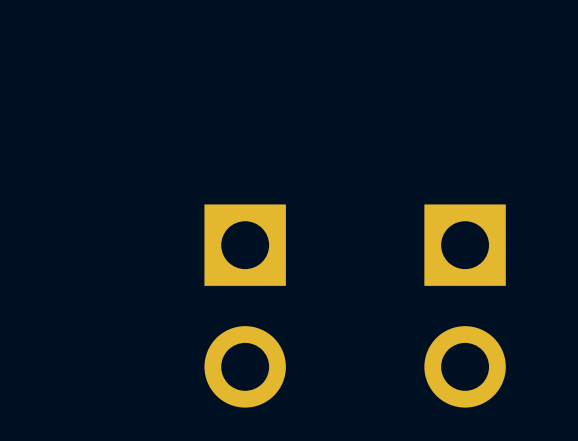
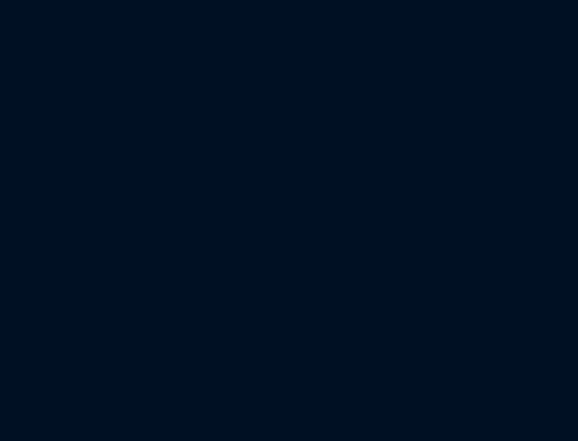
part: (245, 306) -> none
part: (465, 306) -> none

